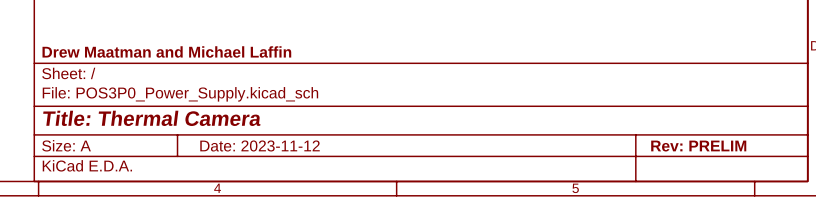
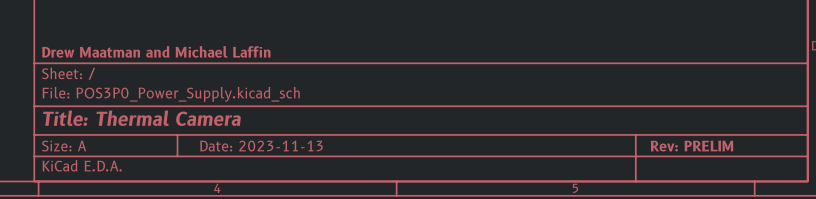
title block: Date: 2023-11-12 (260, 145) -> Date: 2023-11-13 (261, 146)

